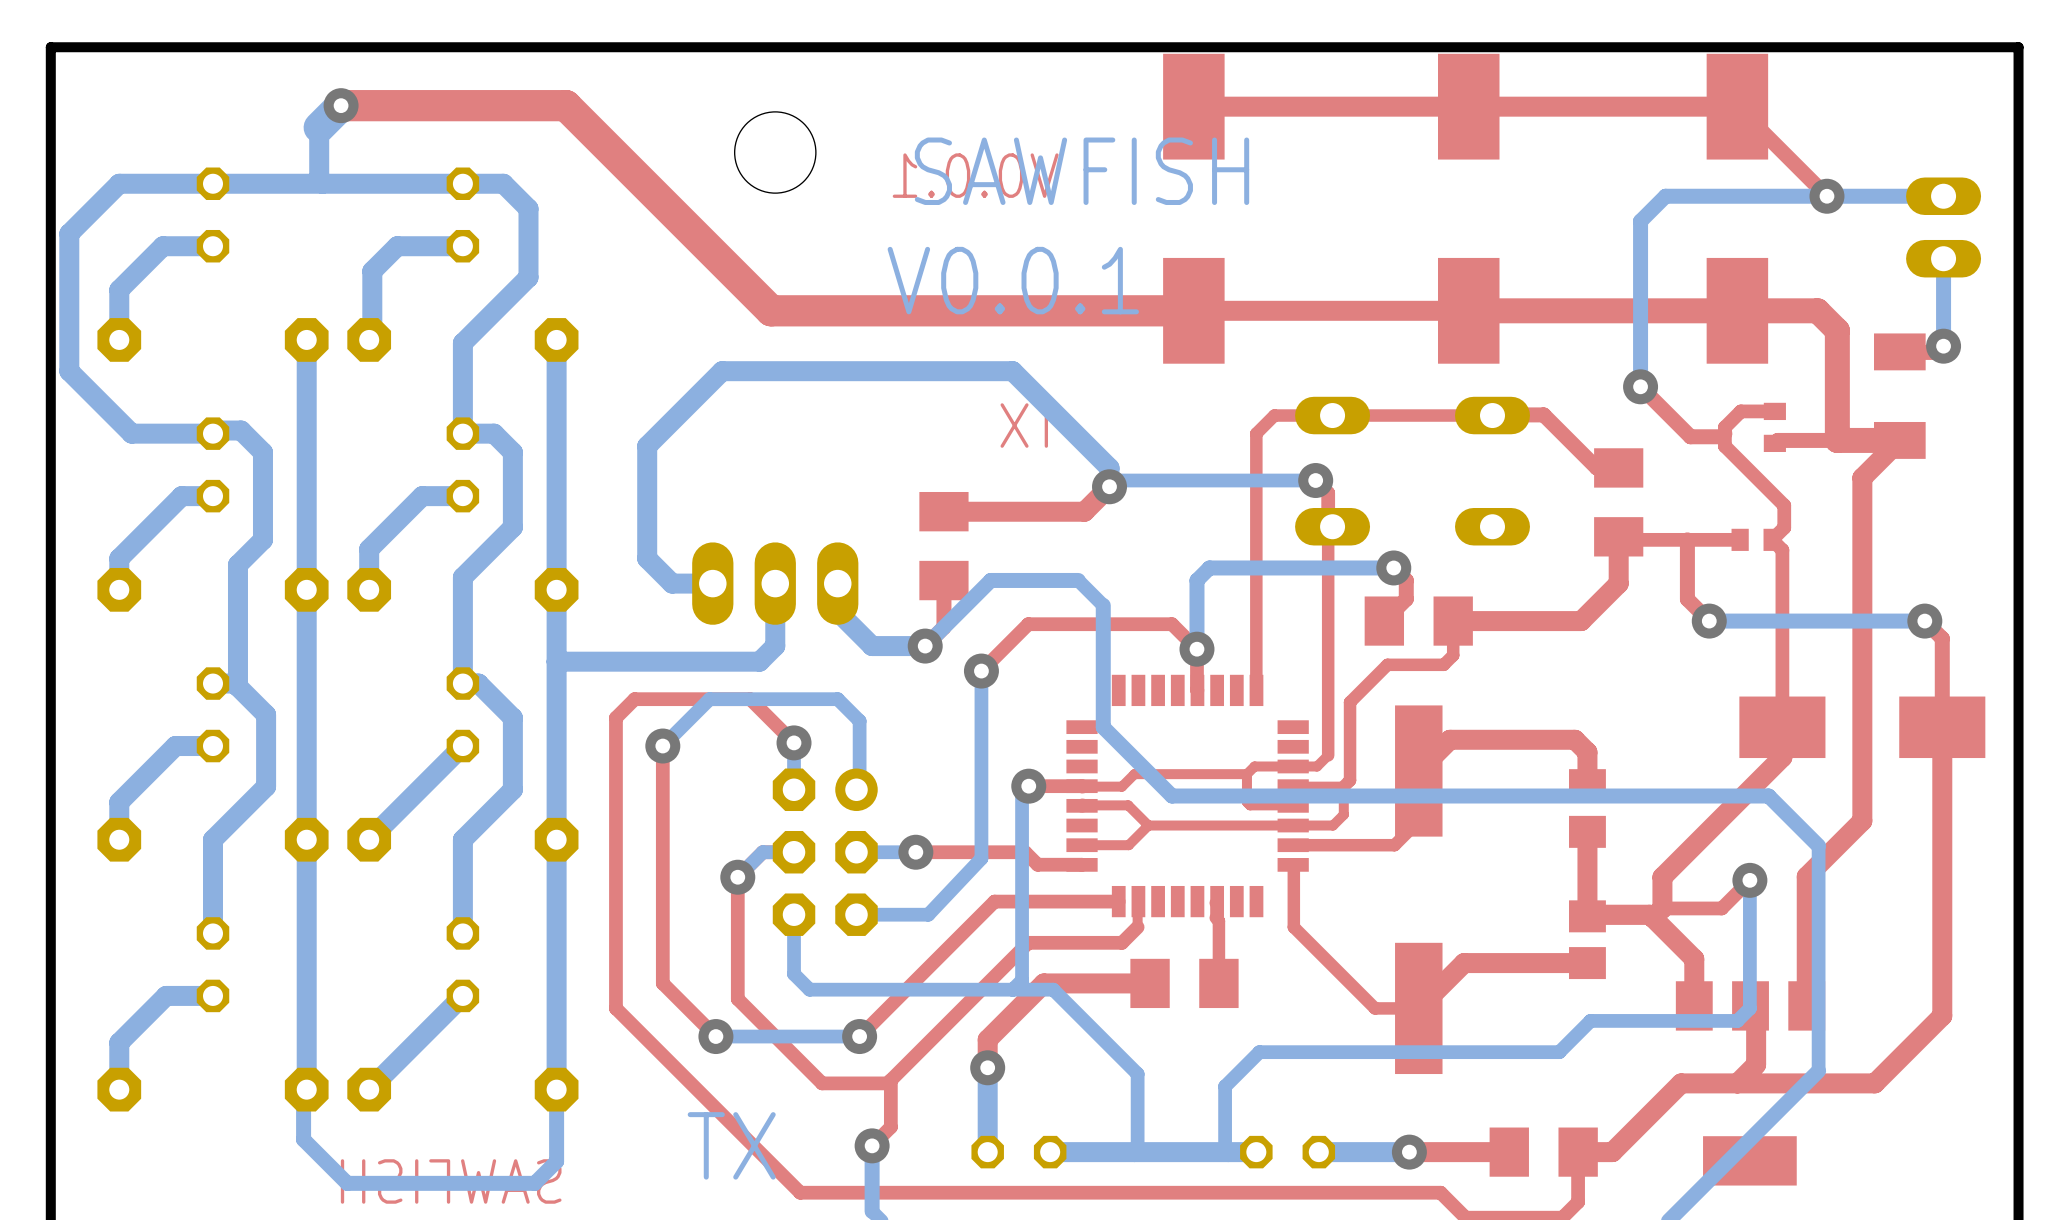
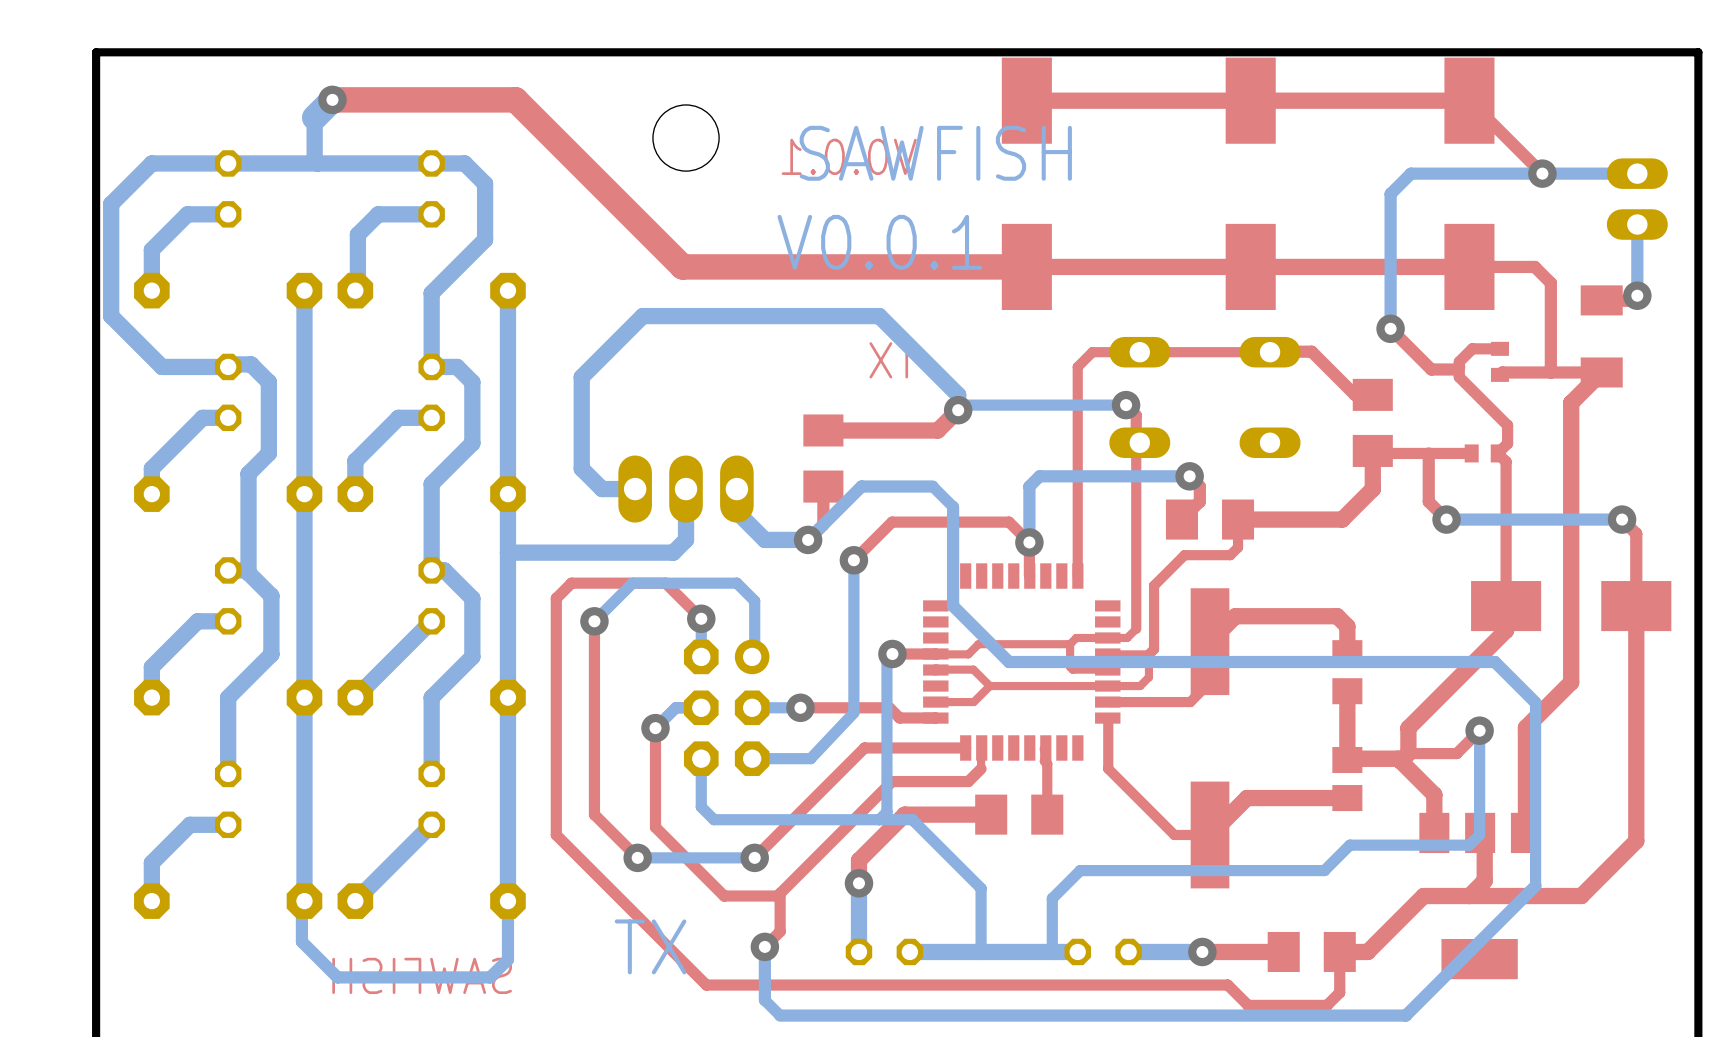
top track width: thick (1468, 310) (1817, 310) (1837, 330) (1837, 440) (1899, 440) -> thin (1250, 266) (1534, 266) (1550, 283) (1550, 372) (1601, 372)

